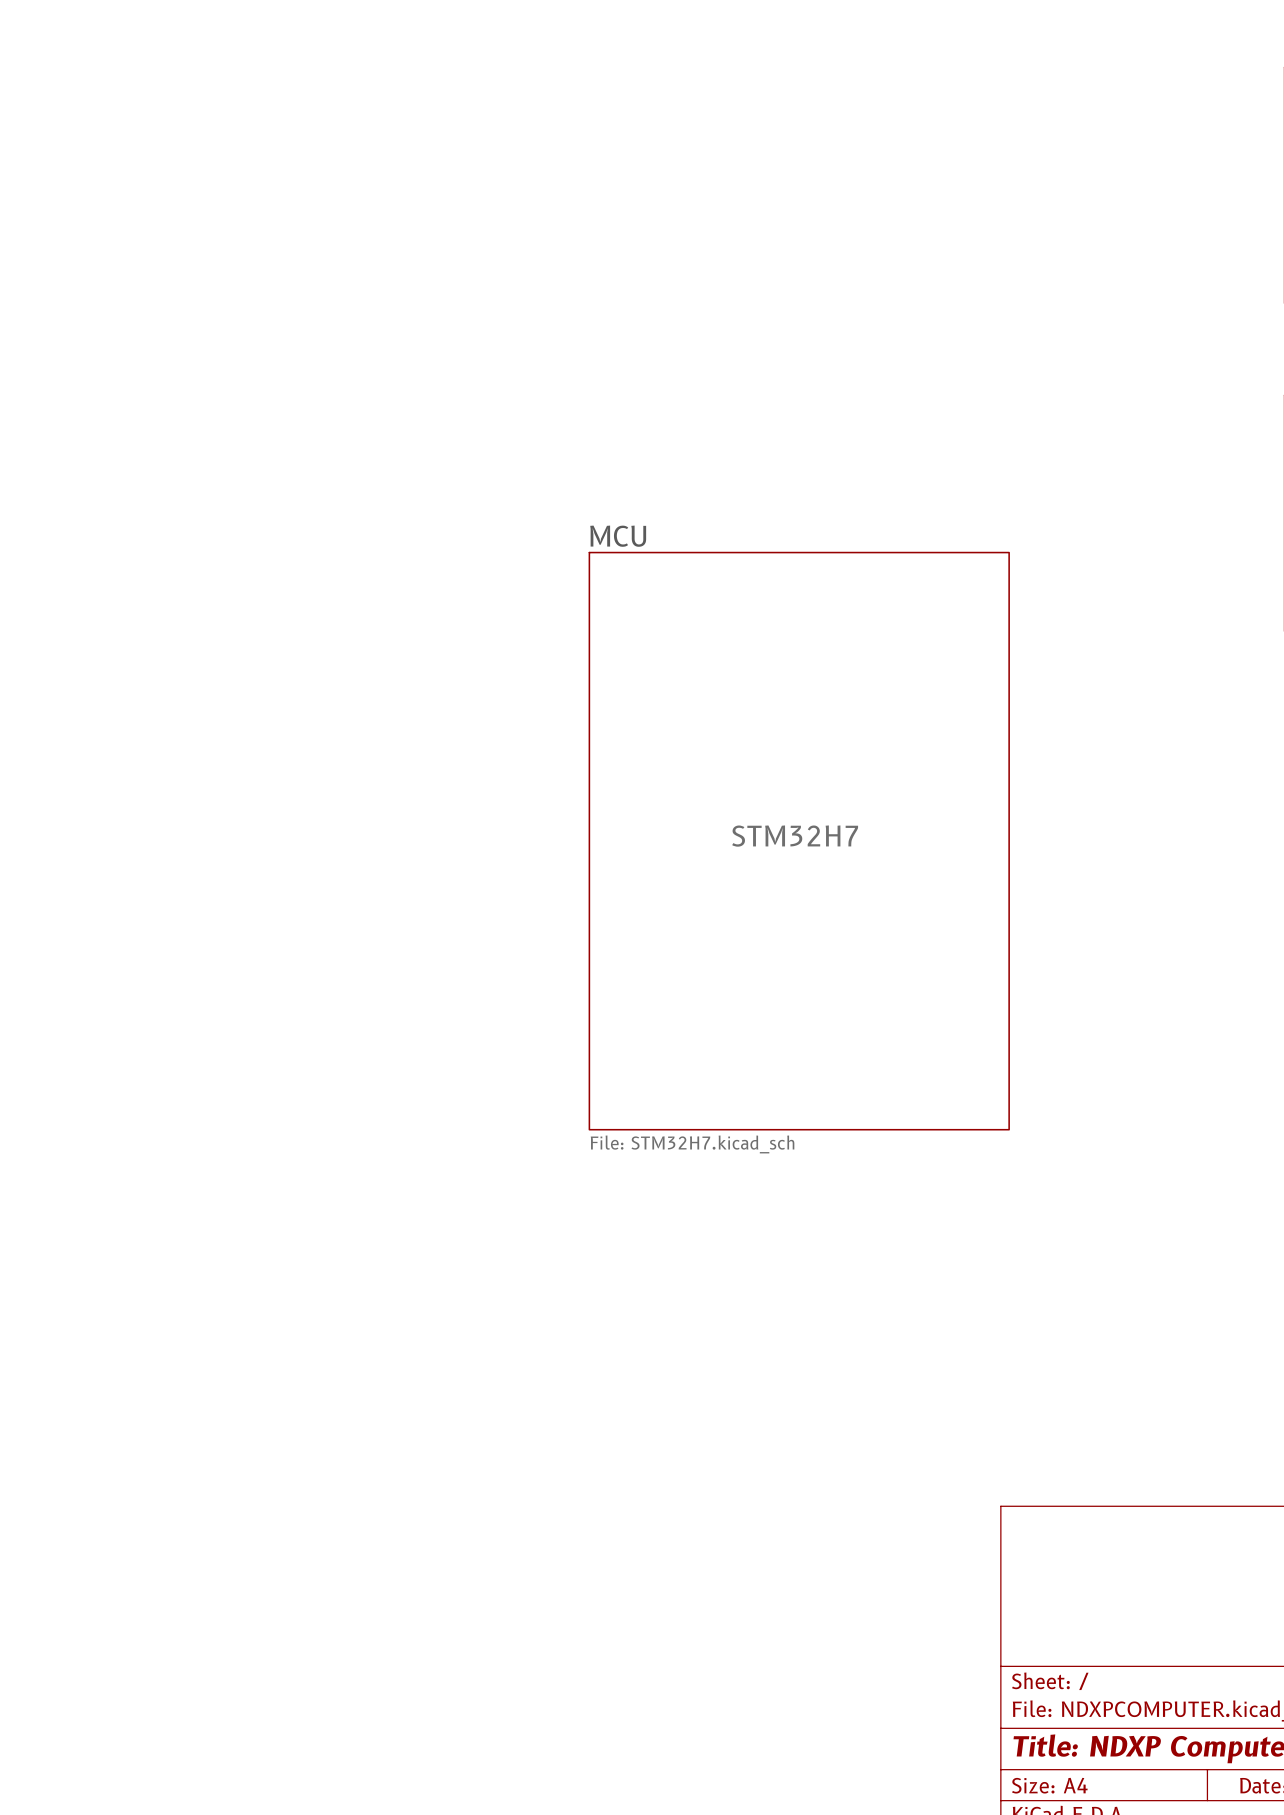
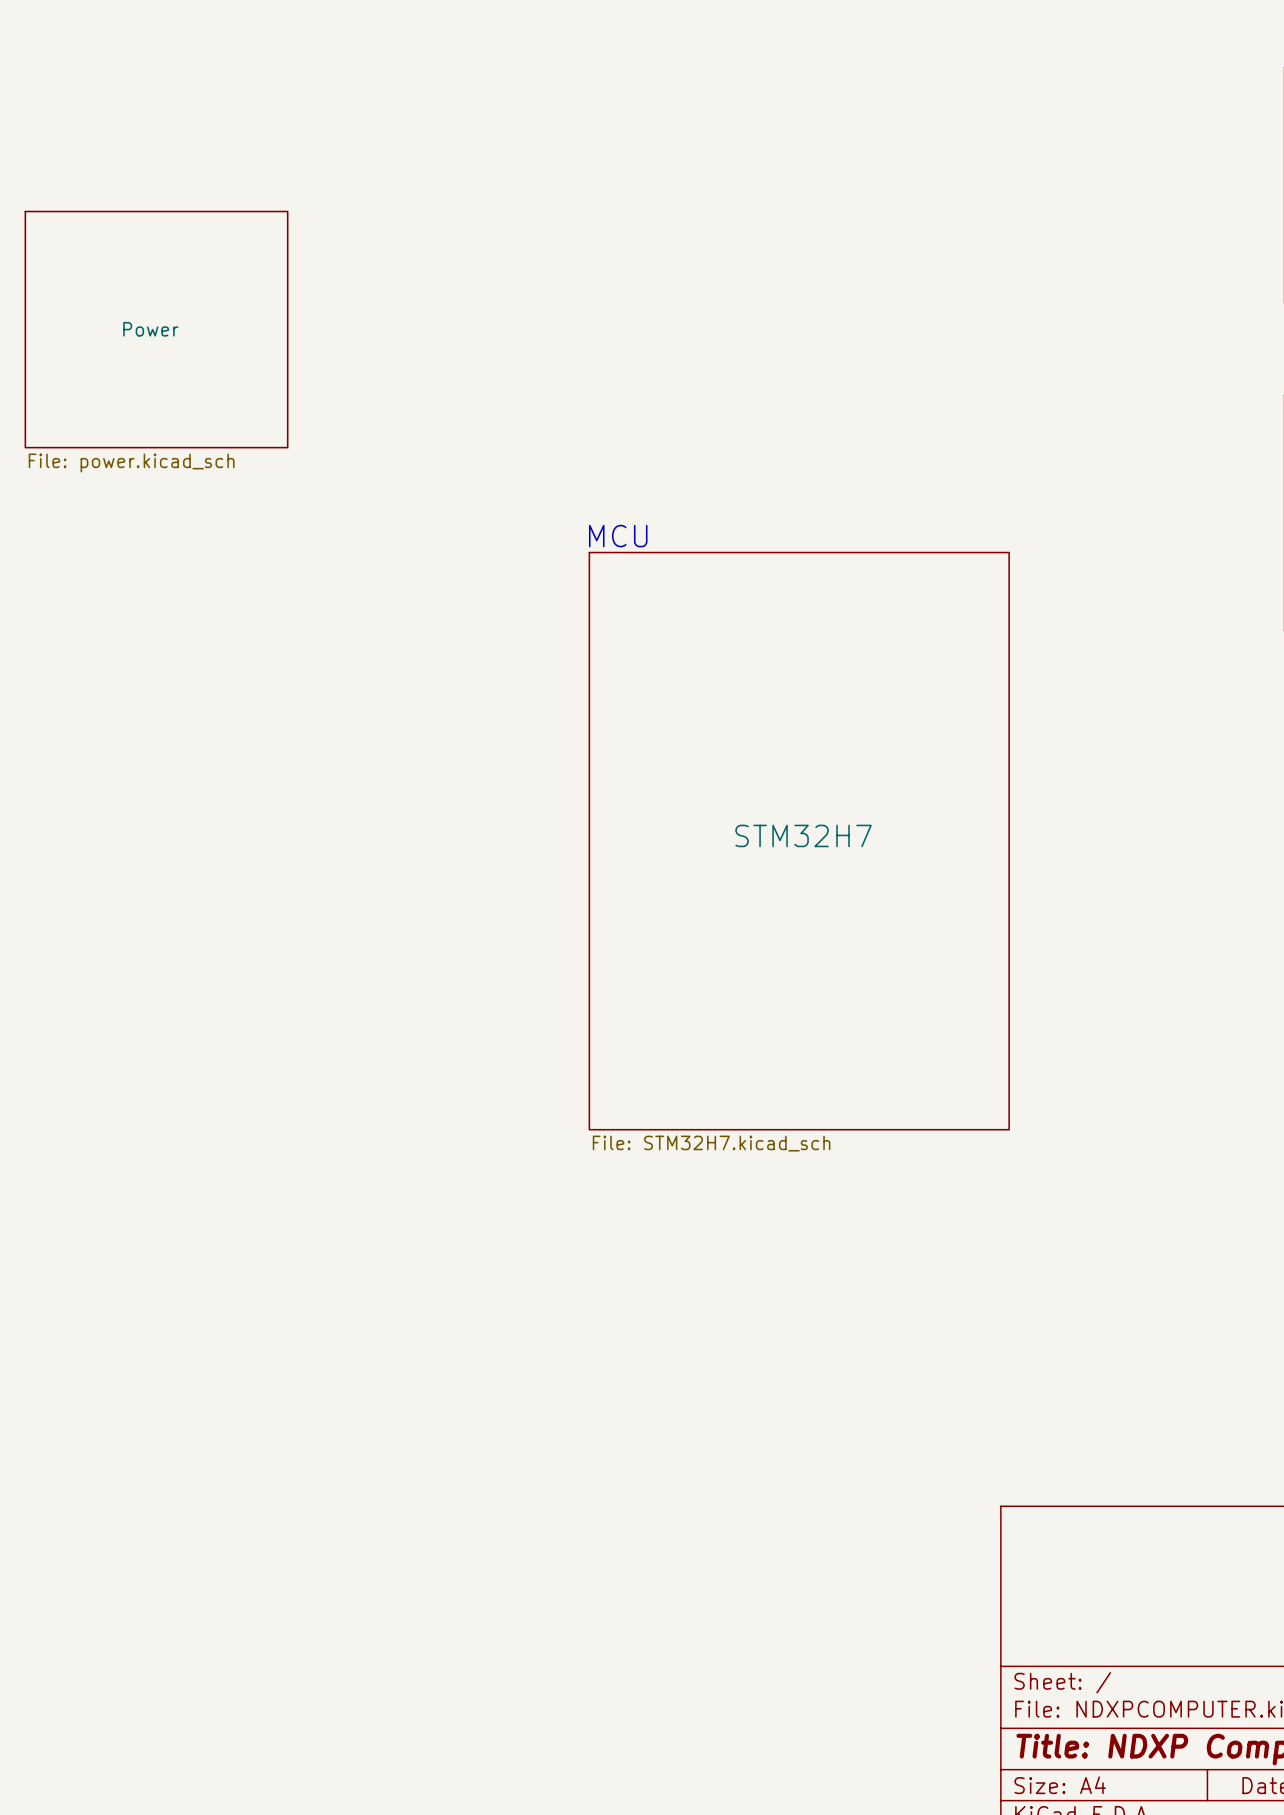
sheet Power: none -> File: power.kicad_sch (156, 329)

